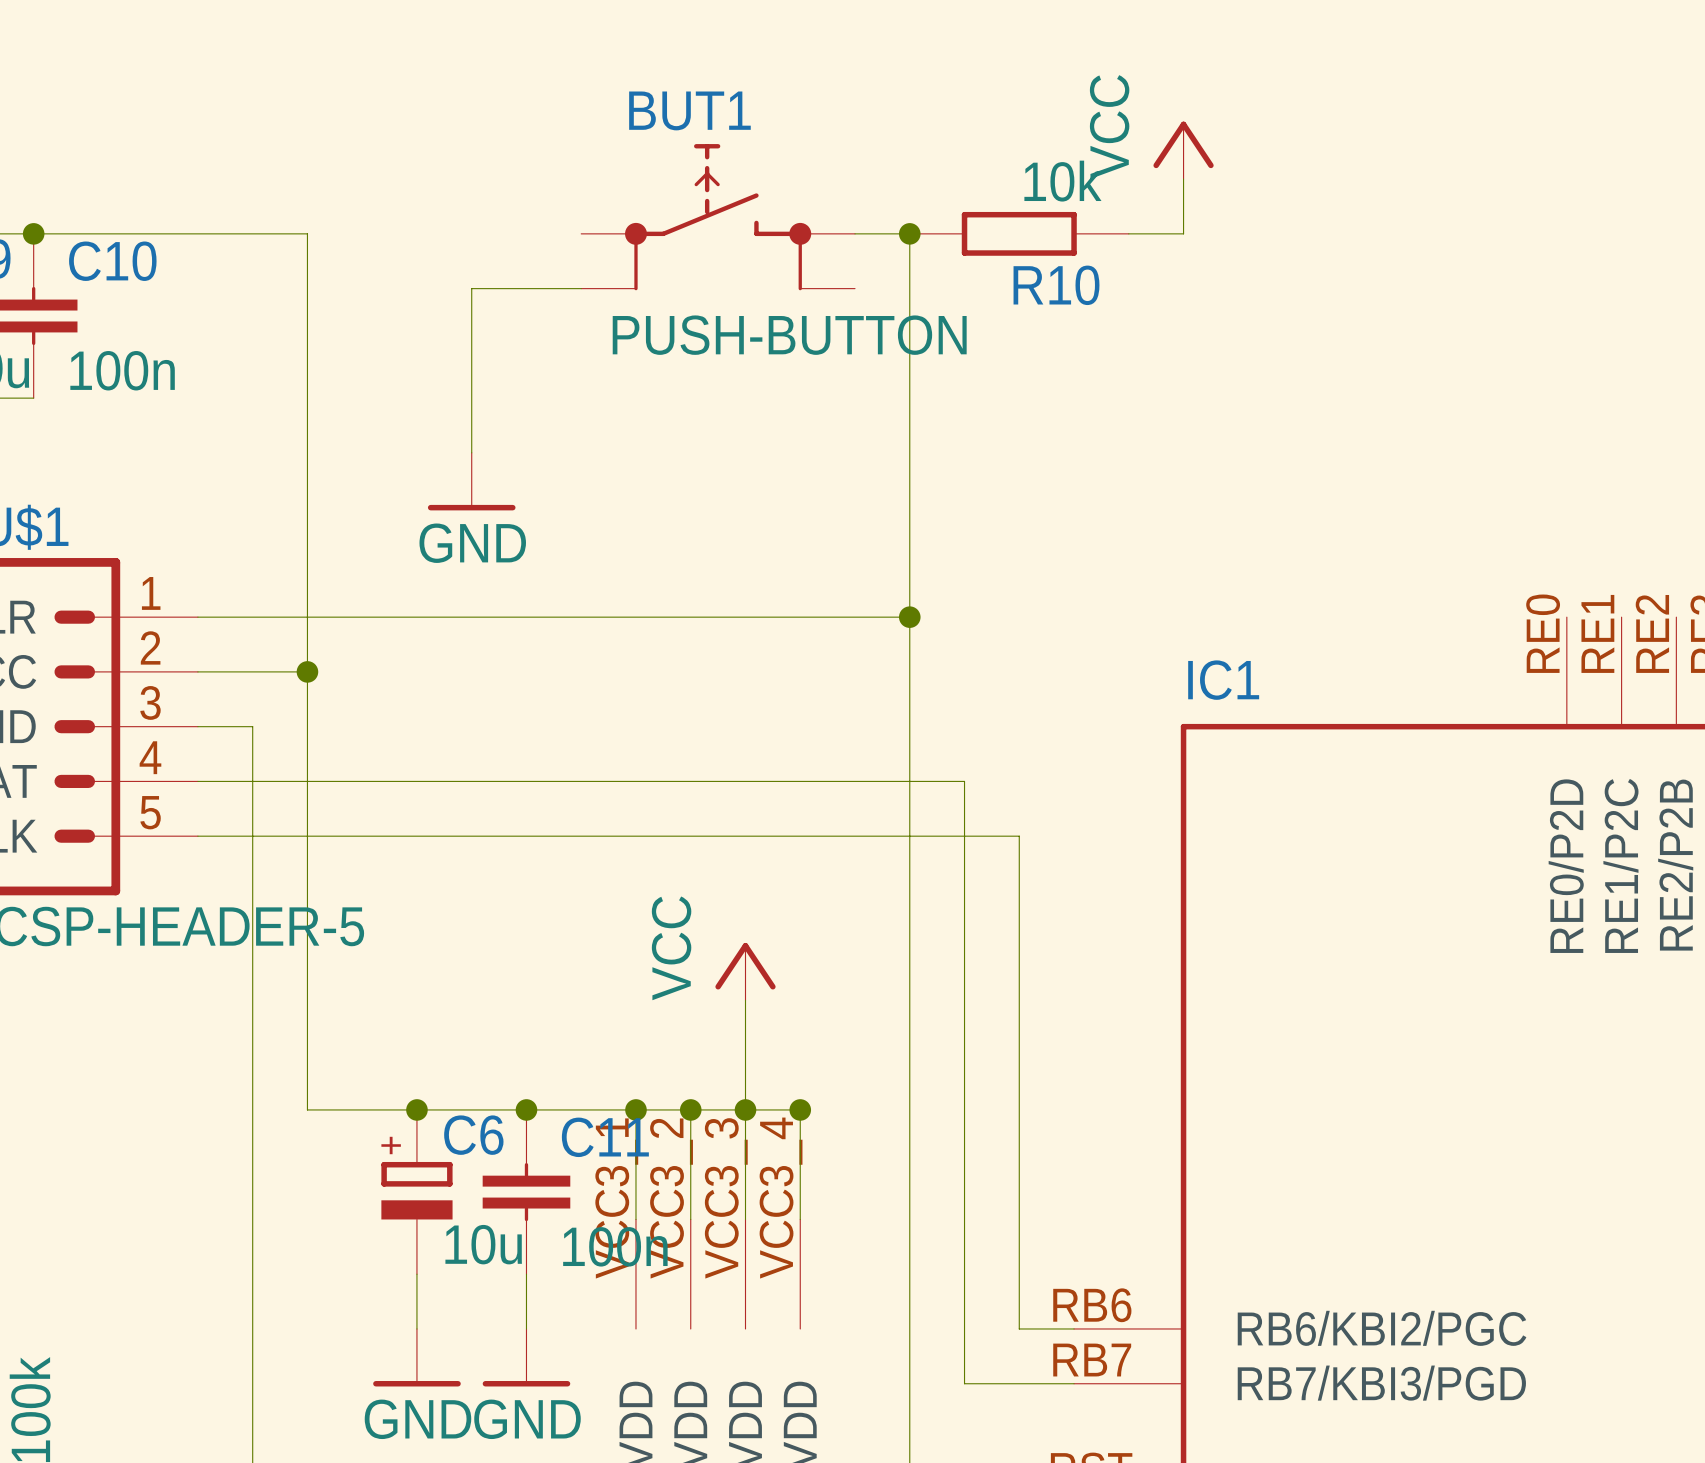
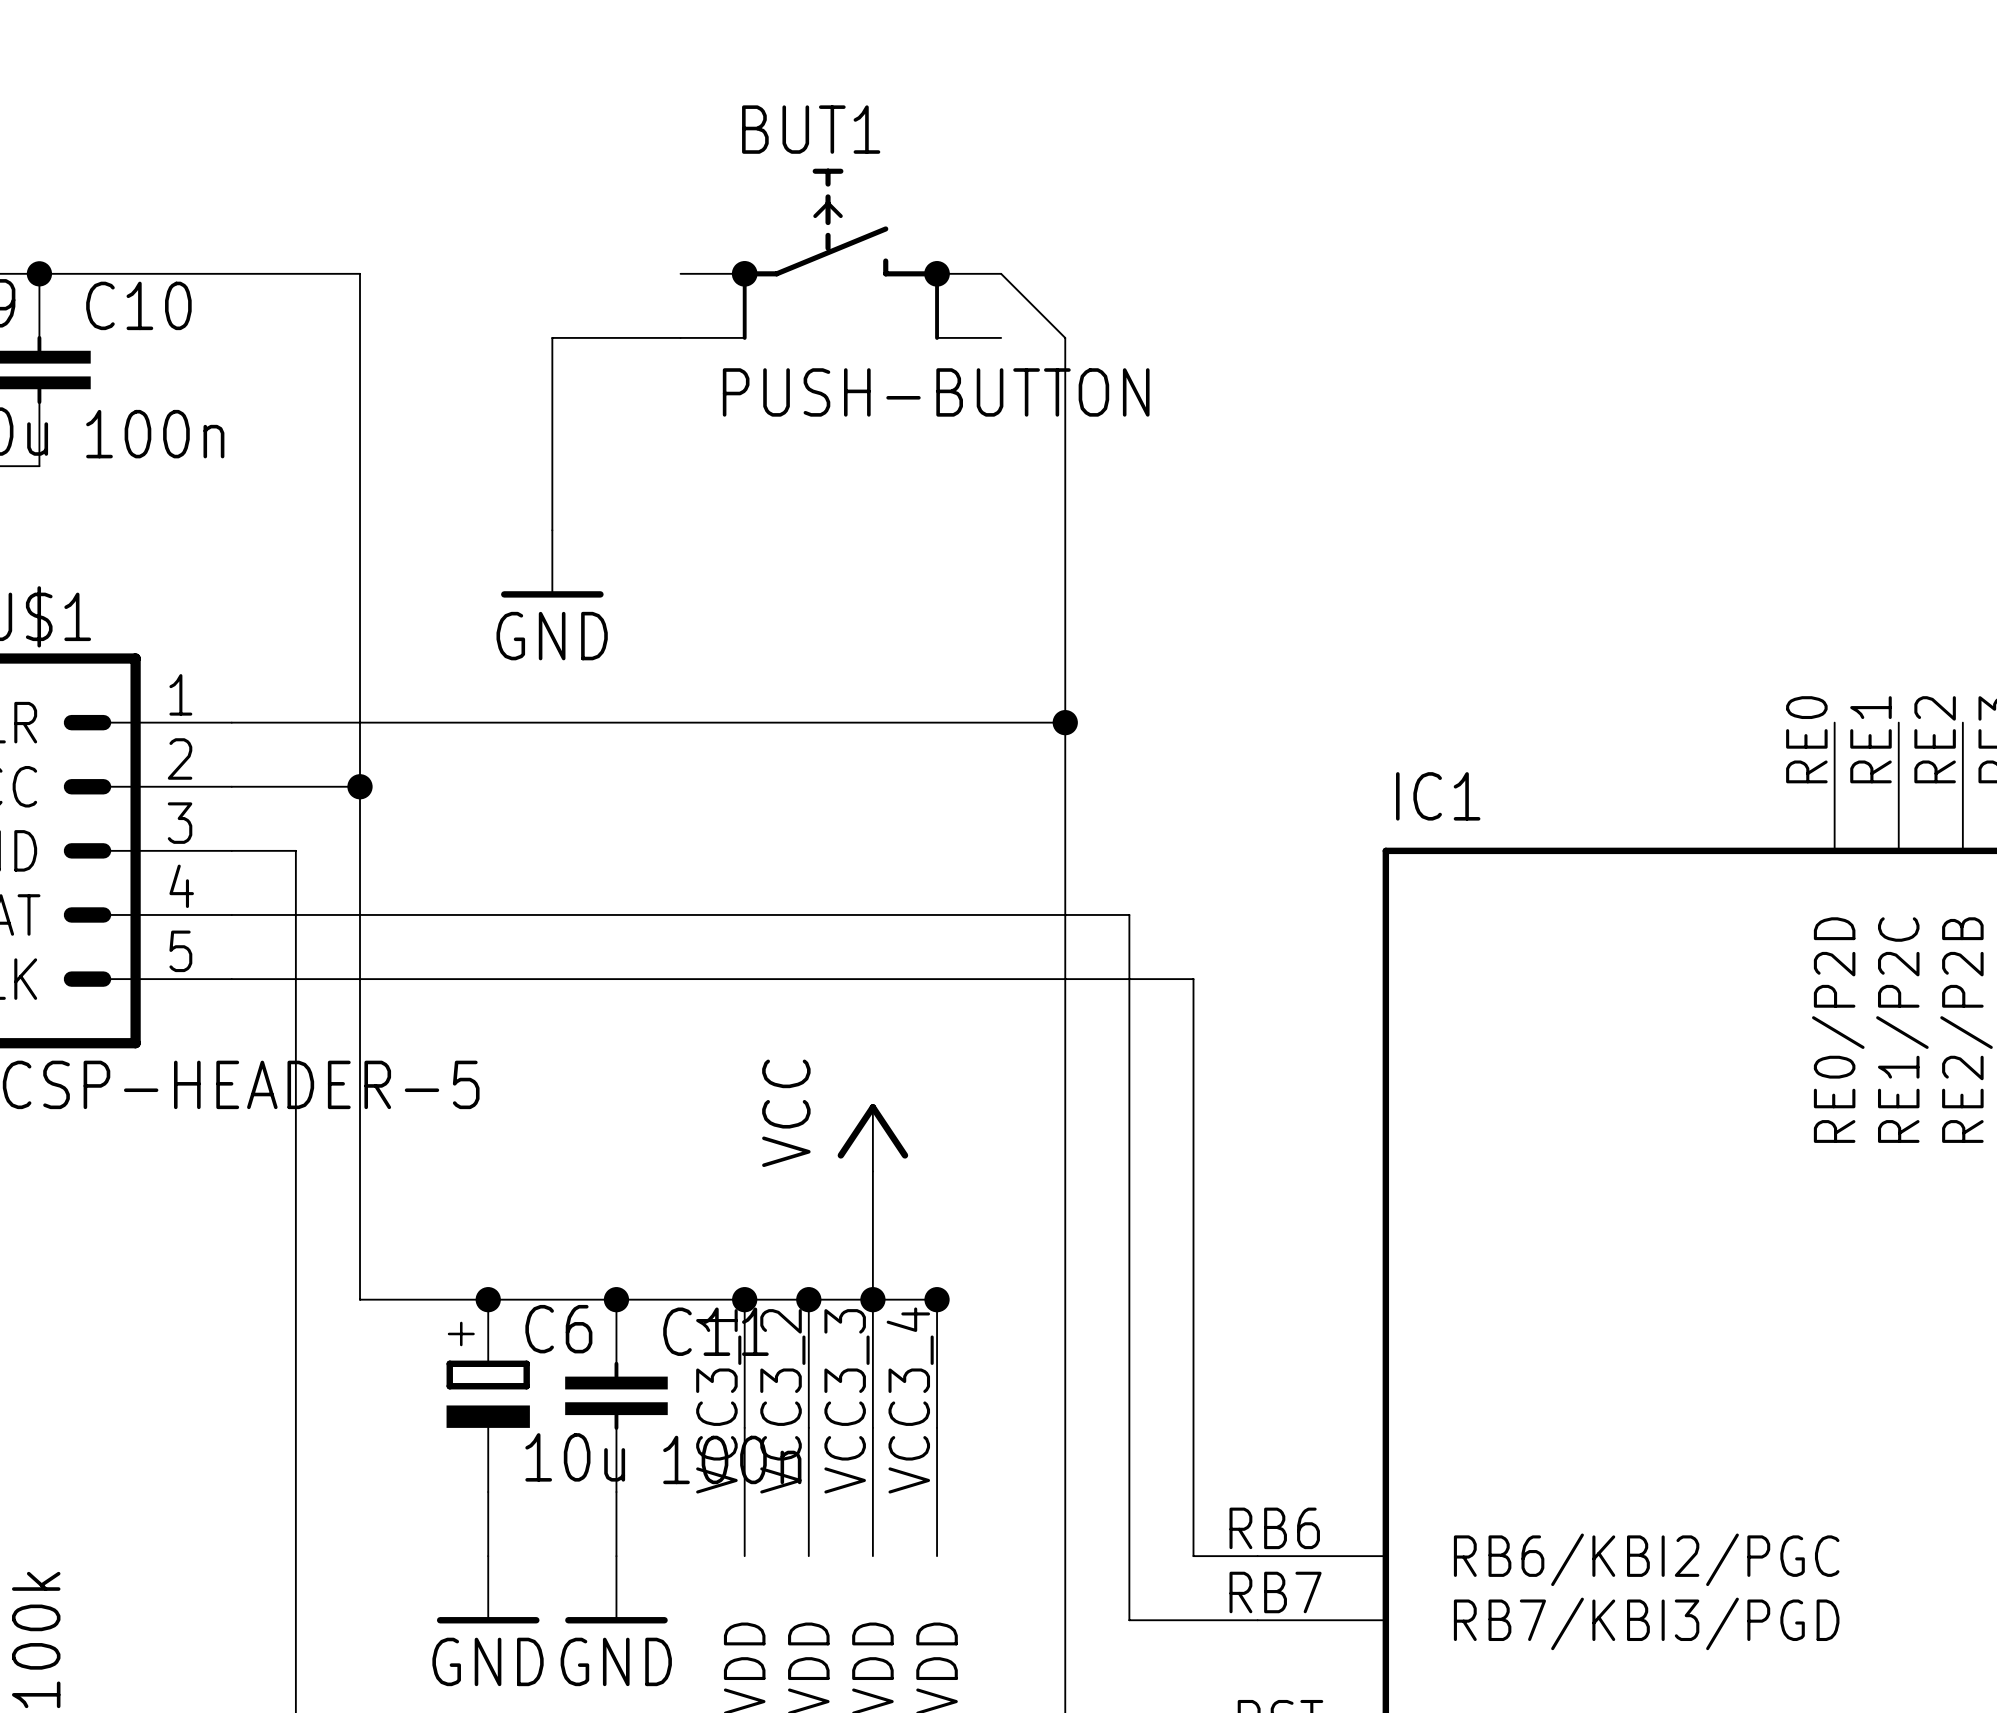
power symbol: VCC (1183, 150) -> none
wire: (1183, 179) (1183, 233) (1128, 233) -> none
wire: (855, 233) (909, 233) (909, 288) -> (1001, 273) (1065, 337)
junction: (909, 233) -> none
R10: 10k (1019, 233) -> none

